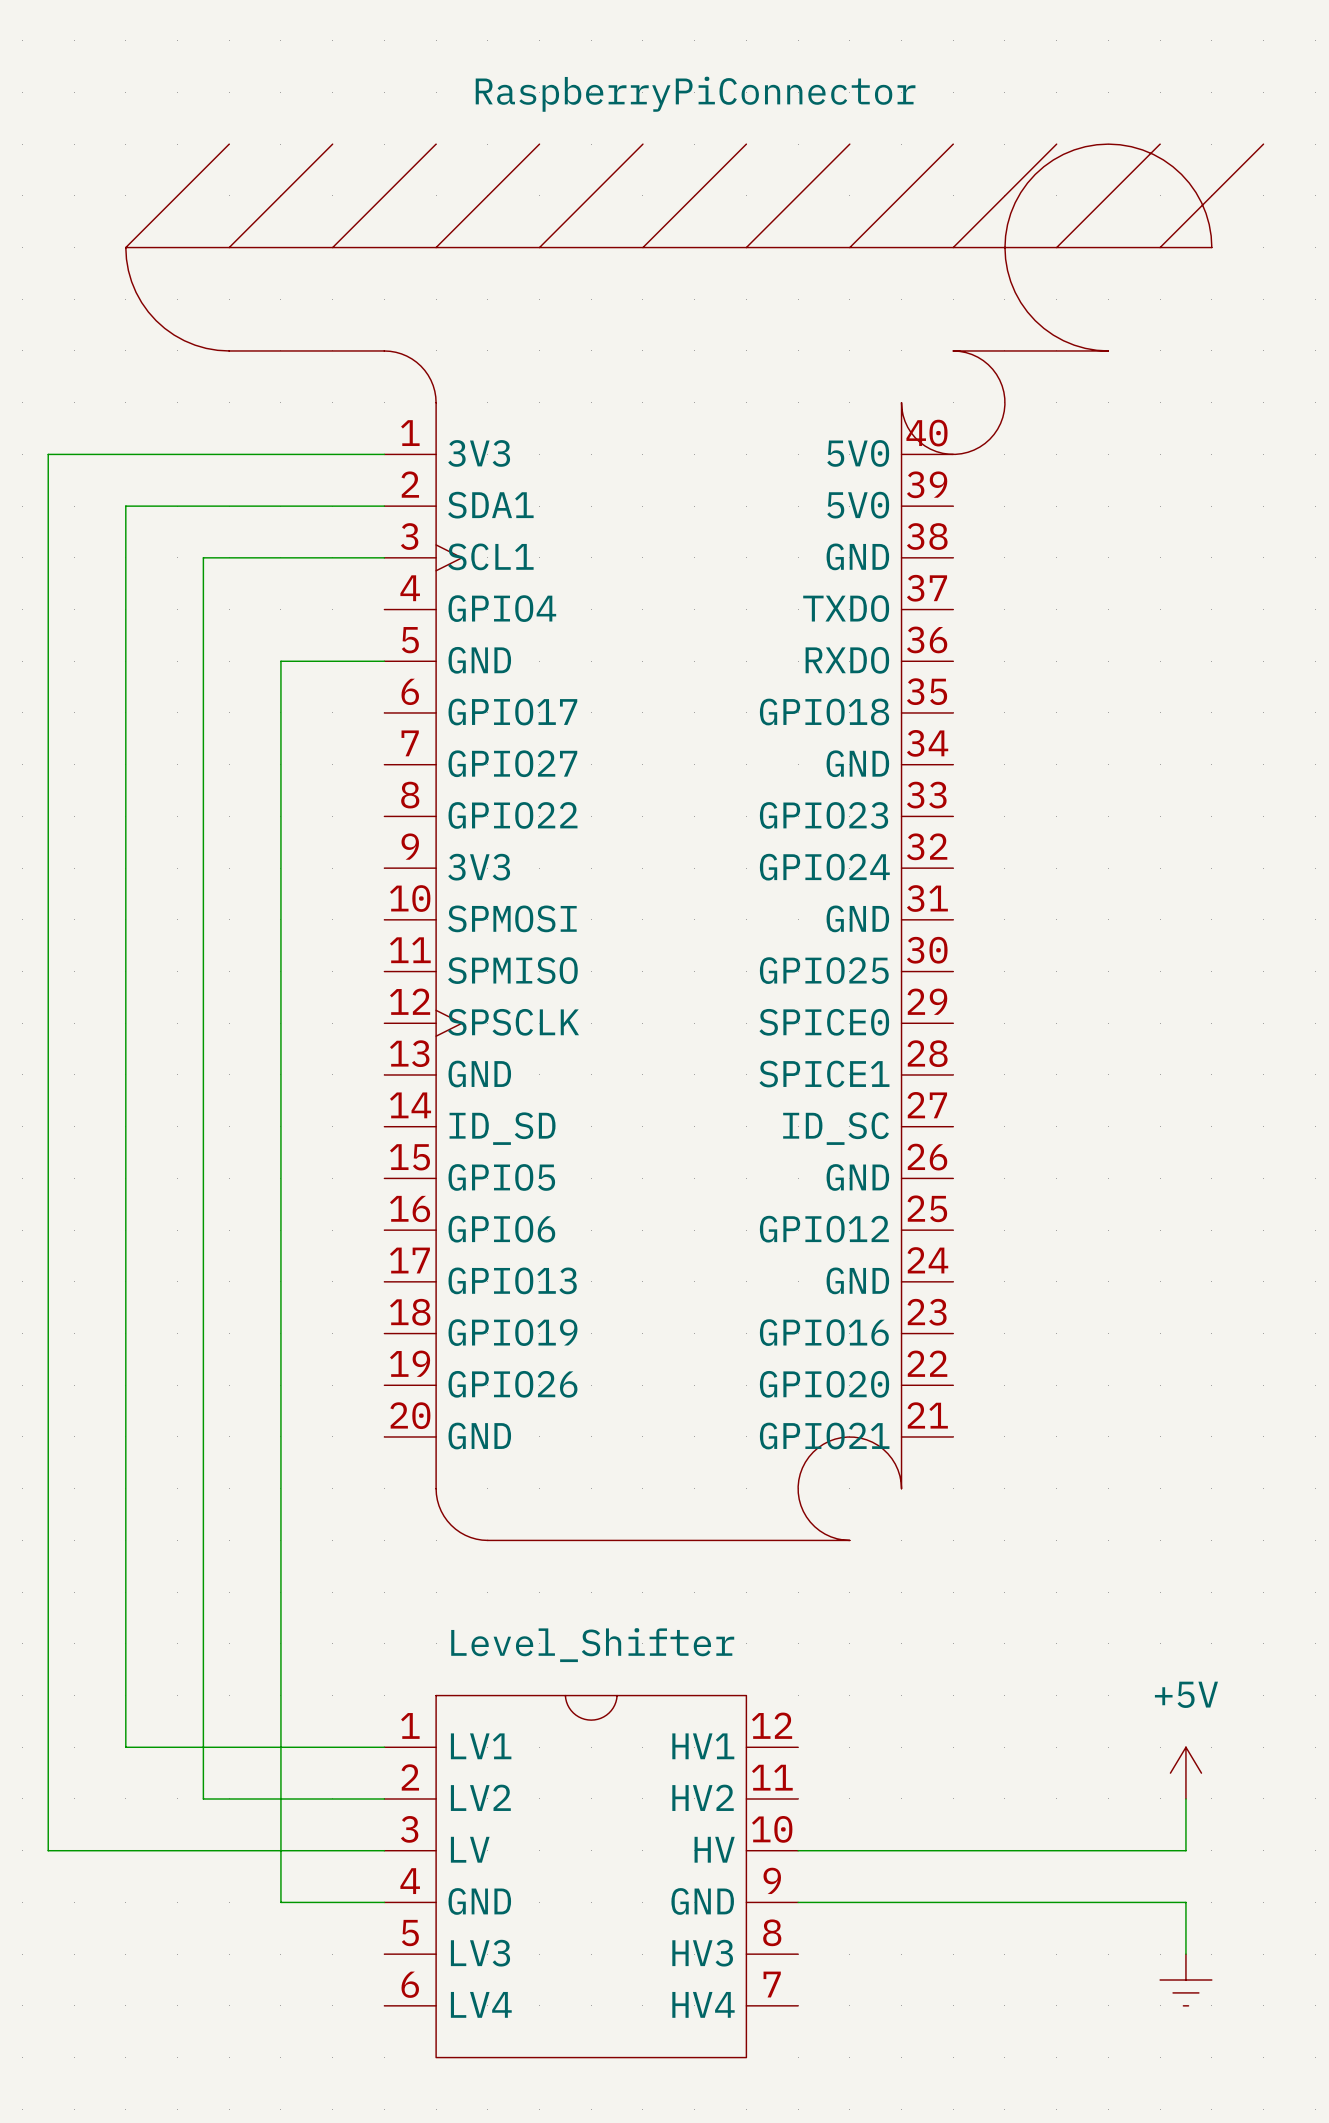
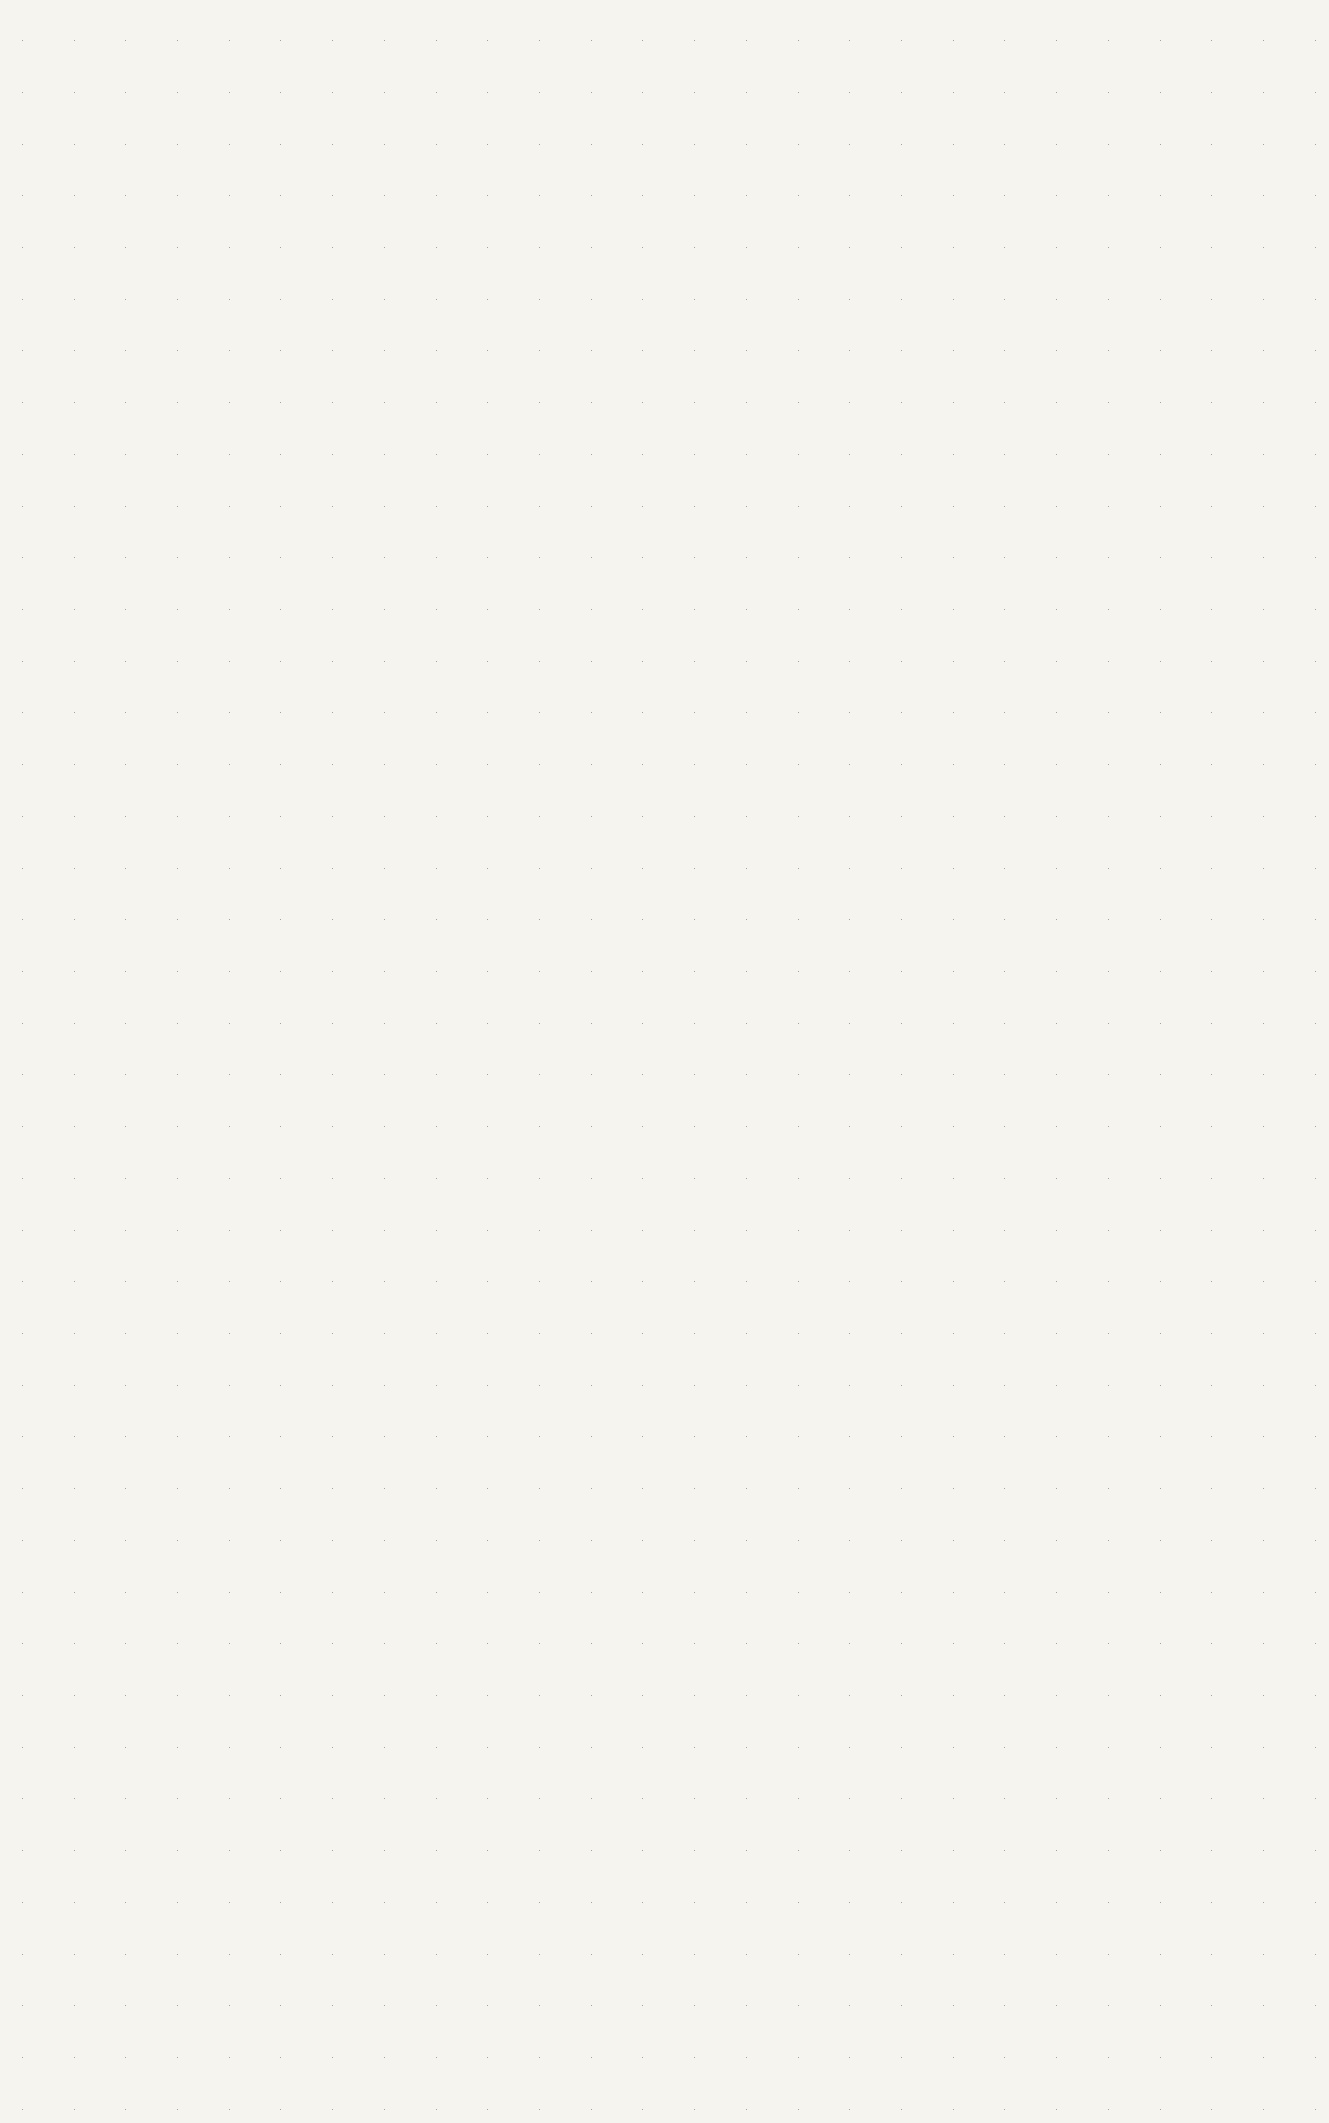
wire: (384, 454) (48, 454) (48, 1850) (384, 1850) -> none
wire: (384, 506) (125, 506) (125, 1747) (384, 1747) -> none
wire: (384, 557) (203, 557) (203, 1798) (384, 1798) -> none
wire: (384, 661) (280, 661) (280, 1902) (384, 1902) -> none
part: RaspberryPiConnector (694, 842) -> none
power symbol: +5V (1185, 1773) -> none
wire: (1185, 1798) (1185, 1850) (798, 1850) -> none
part: Level_Shifter (591, 1876) -> none
wire: (798, 1902) (1185, 1902) (1185, 1954) -> none
power symbol: (1185, 1980) -> none

